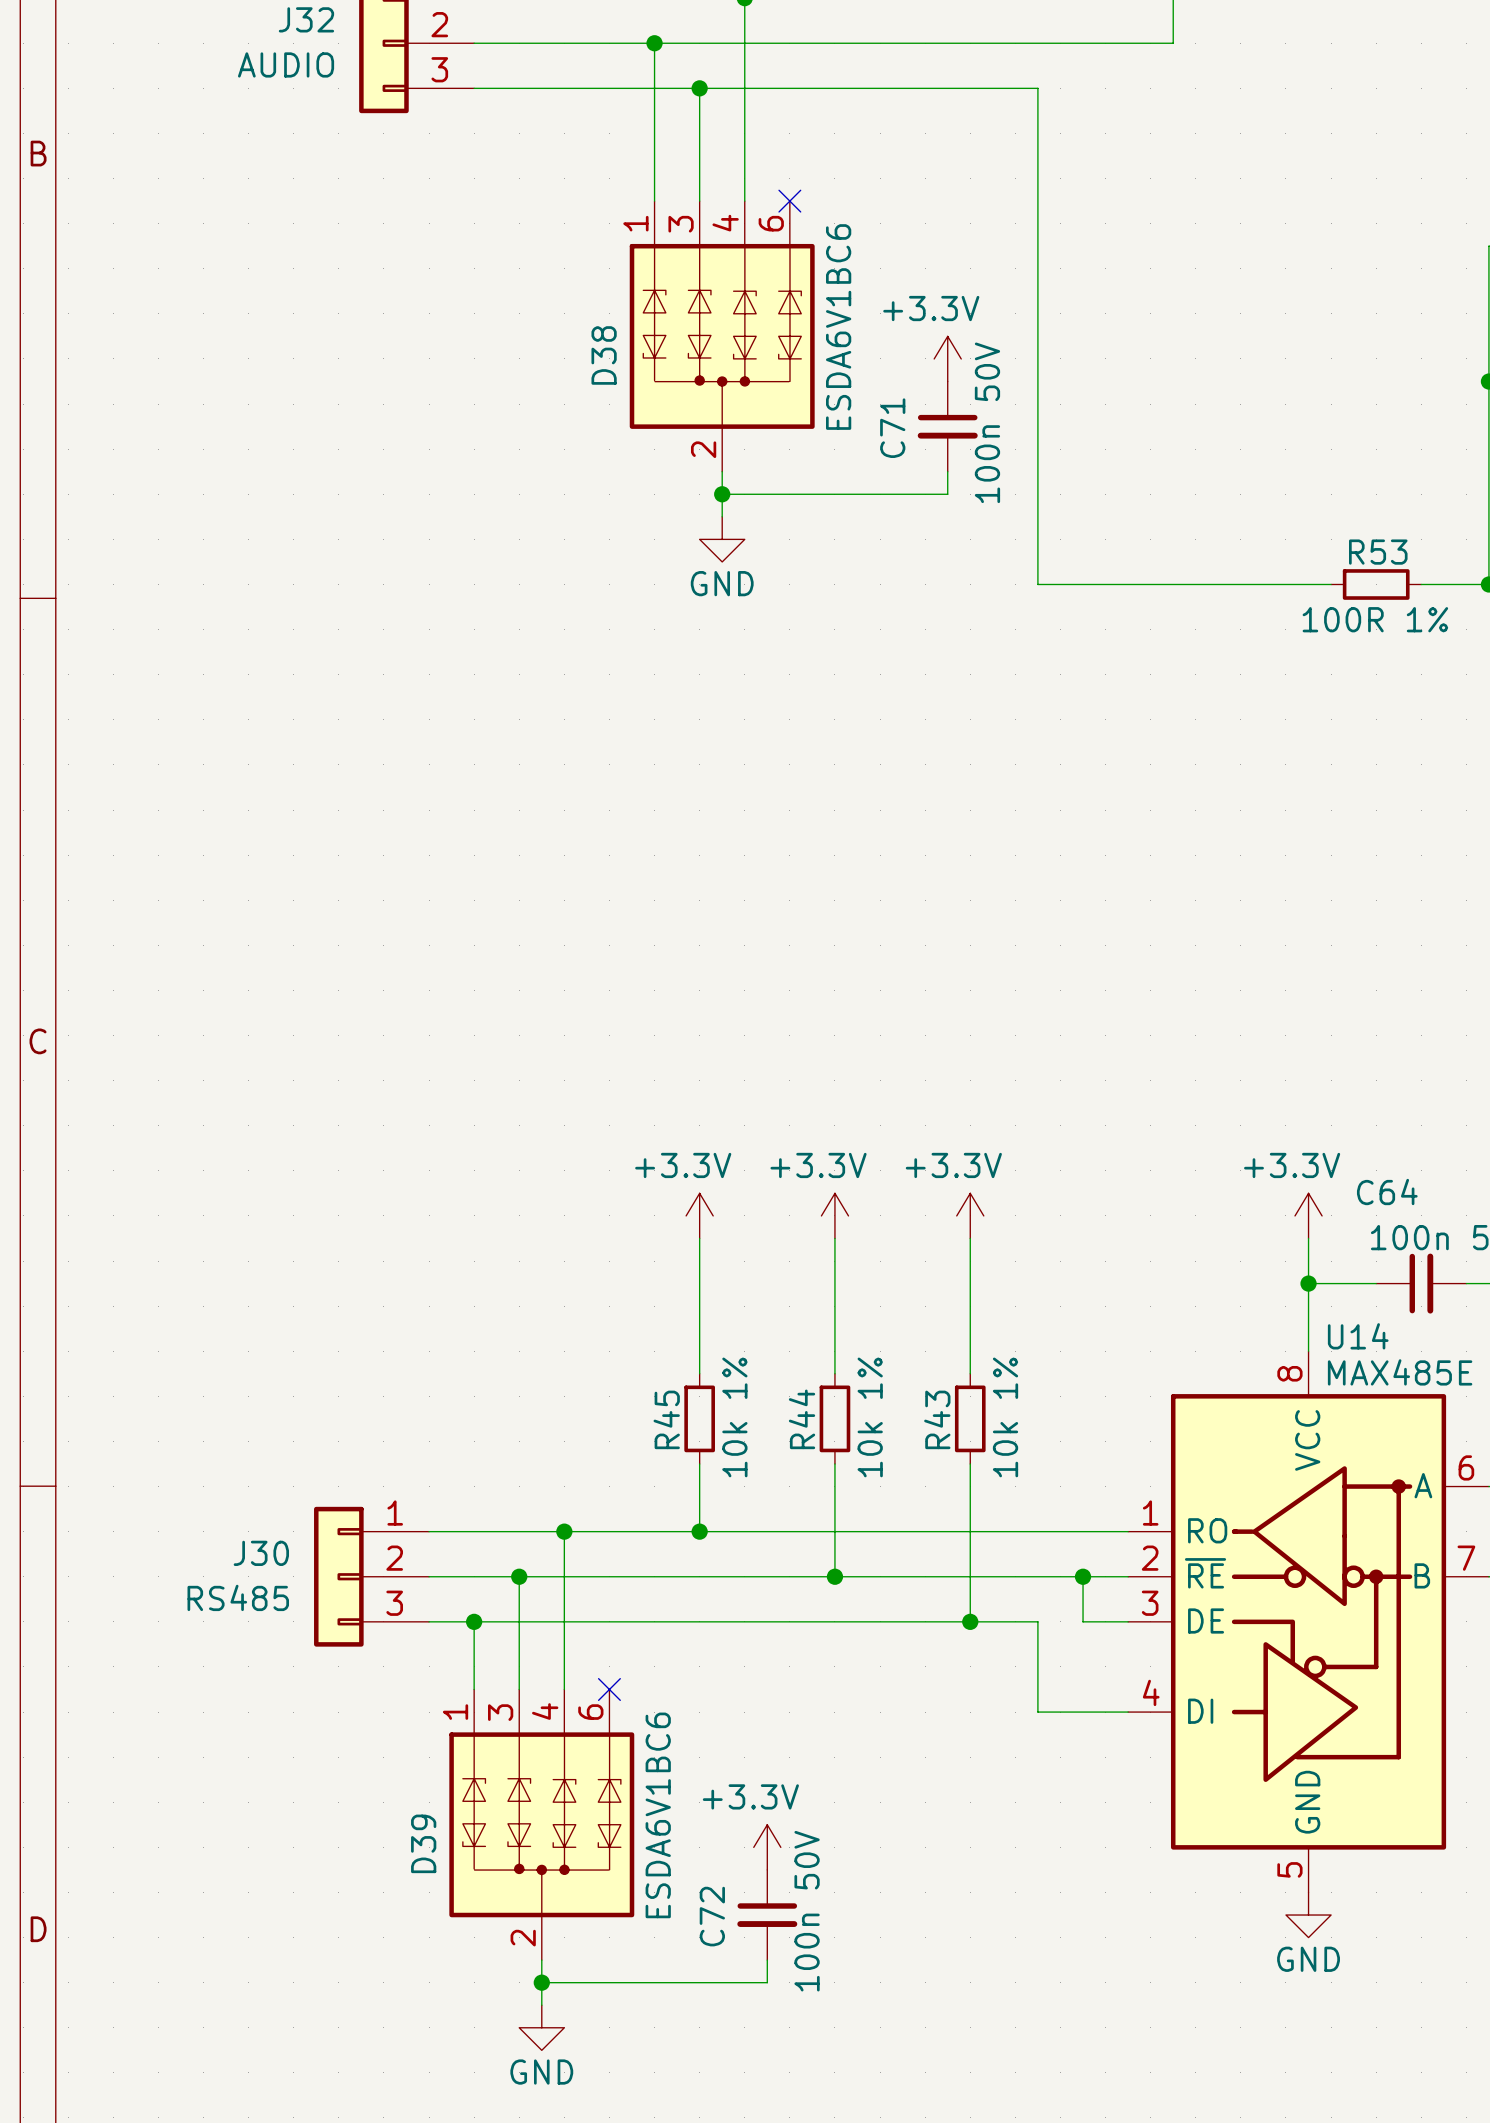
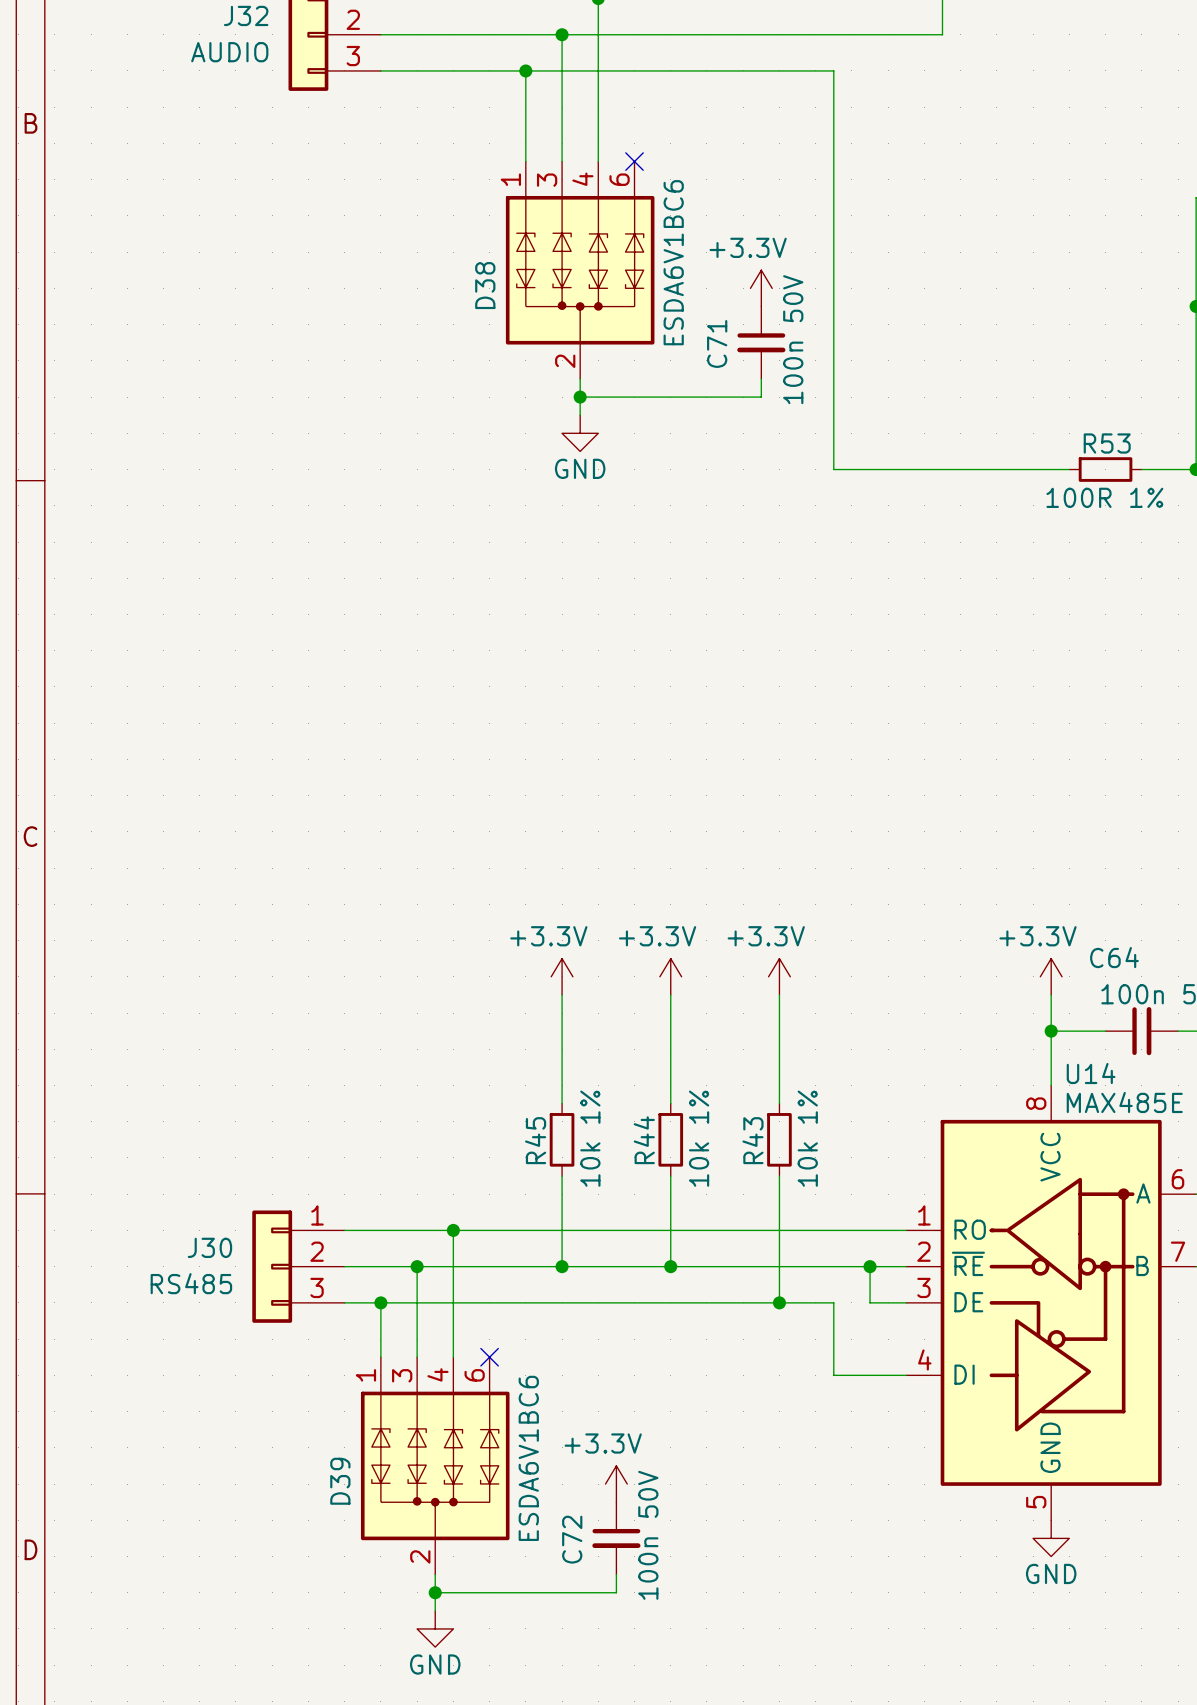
wire: (654, 43) (654, 88) -> (562, 34) (562, 70)
junction: (654, 43) -> none
junction: none -> (562, 34)
junction: none -> (525, 70)
junction: (699, 88) -> none
wire: none -> (562, 1230) (562, 1266)
junction position: (699, 1531) -> (562, 1266)

